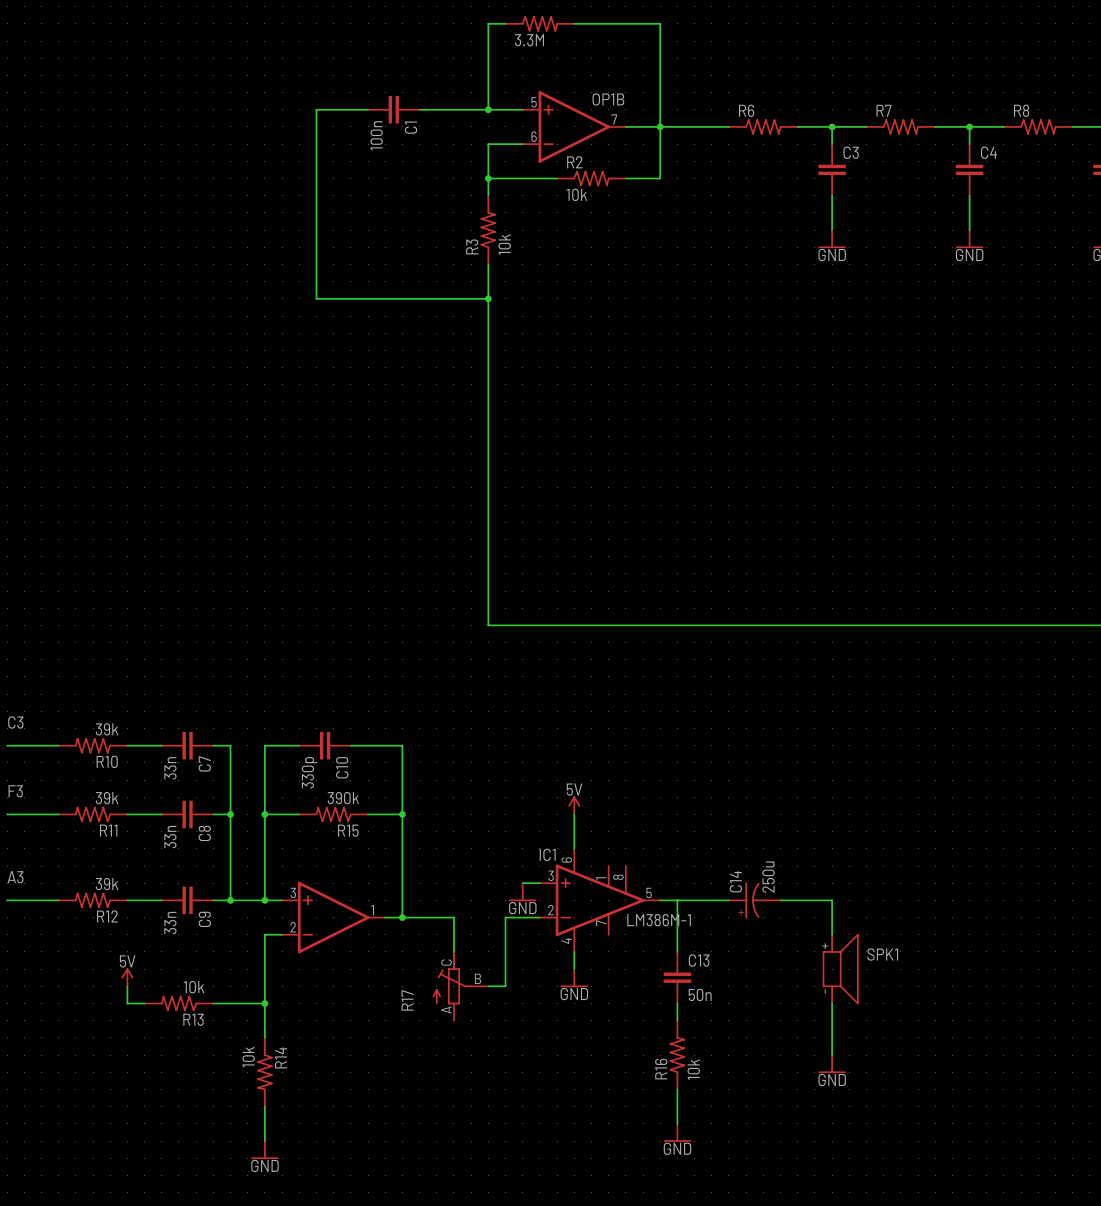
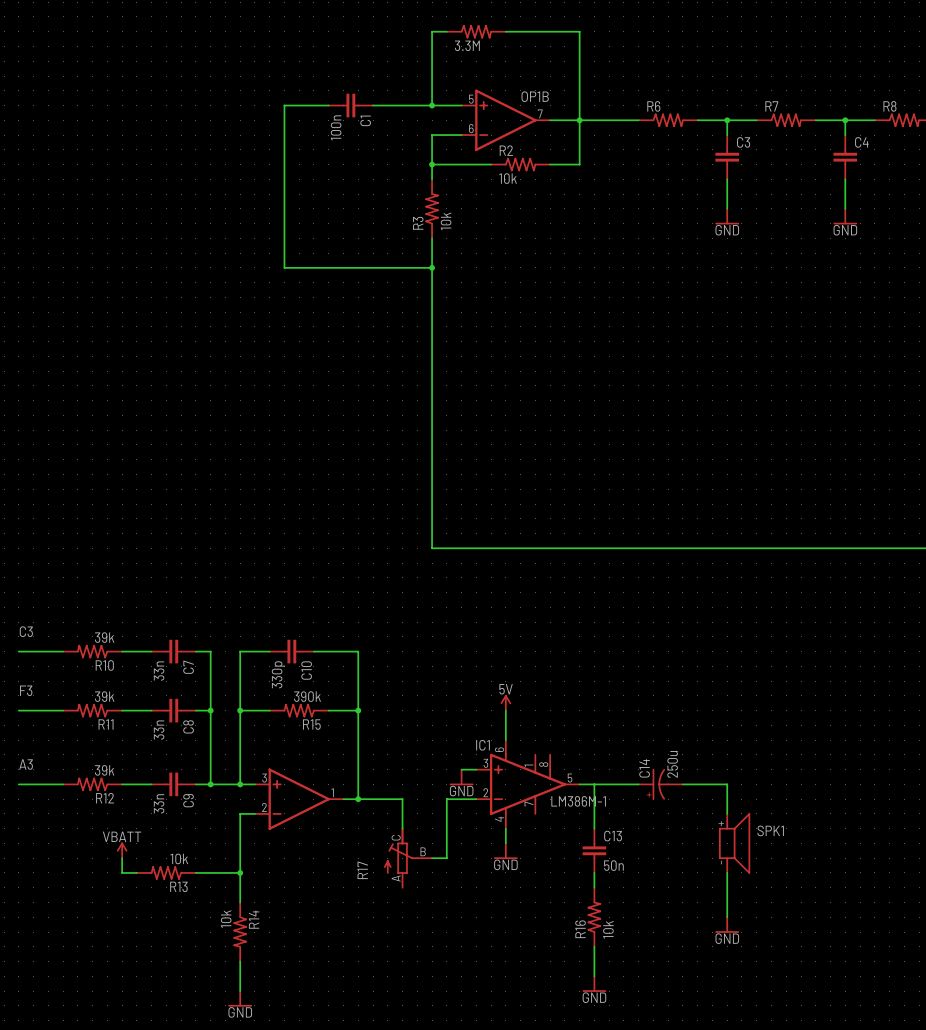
power symbol: 5V (127, 977) -> VBATT (122, 850)

